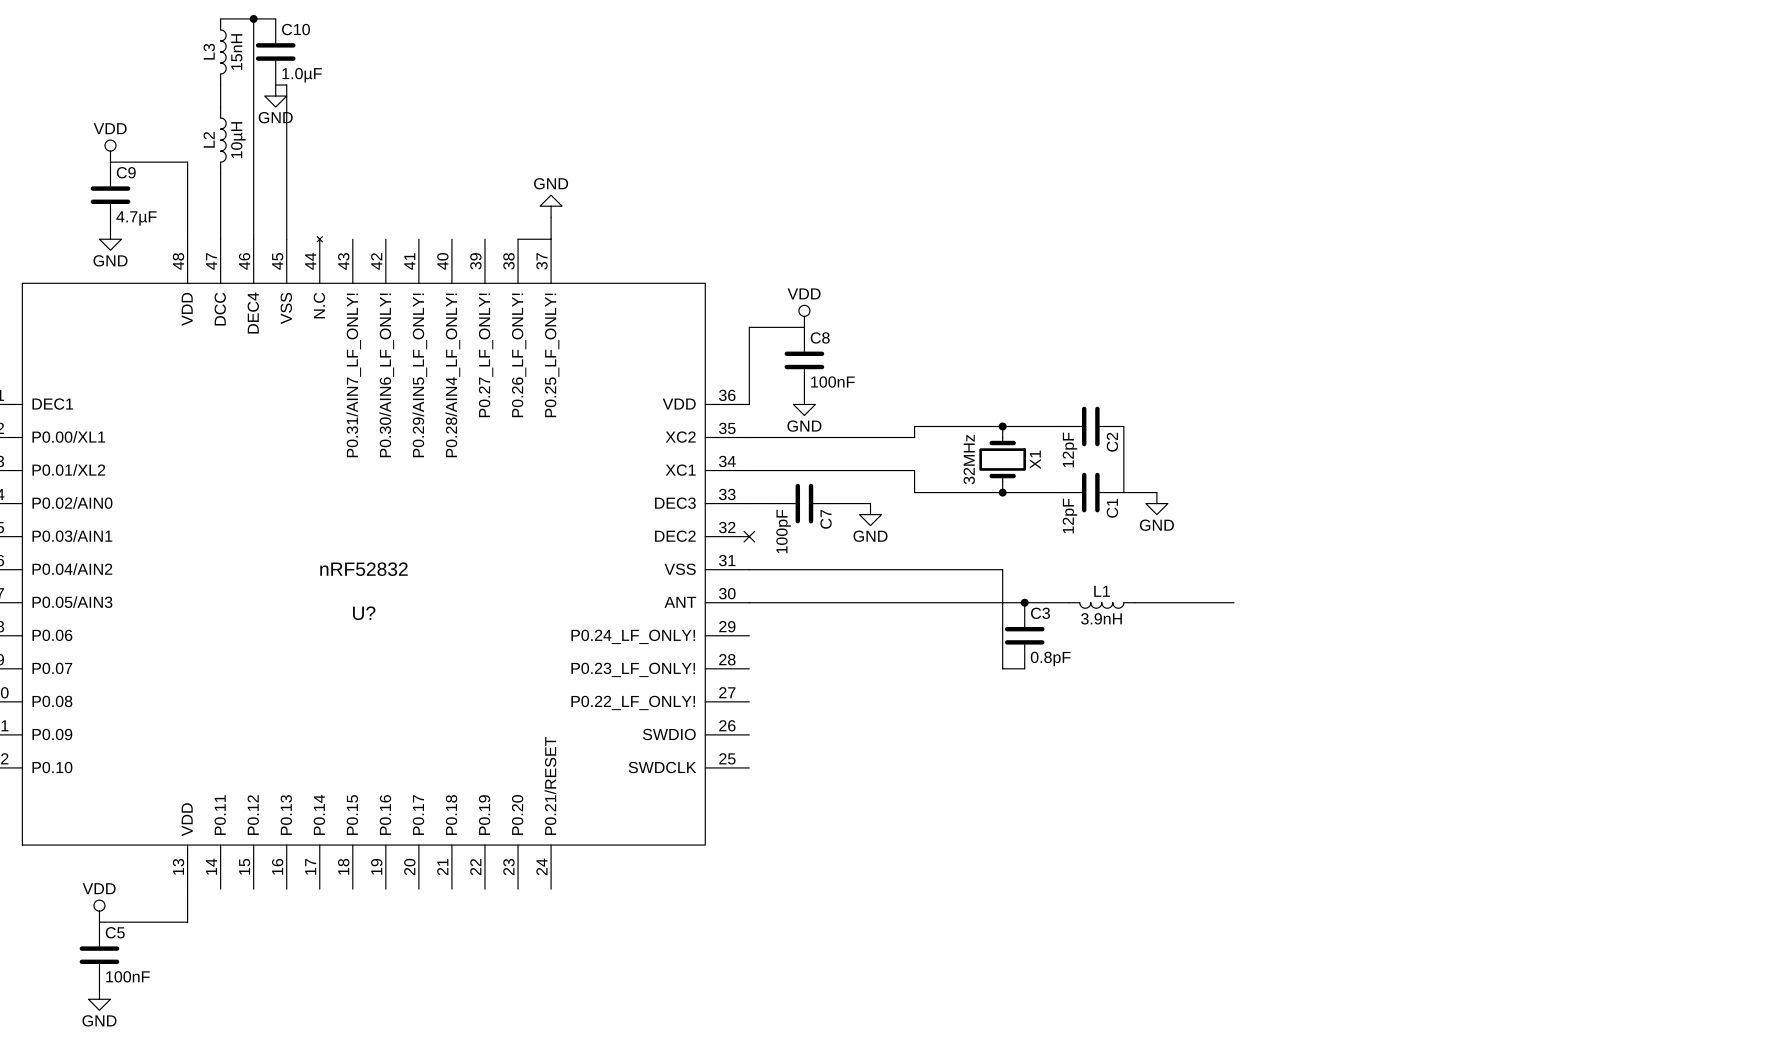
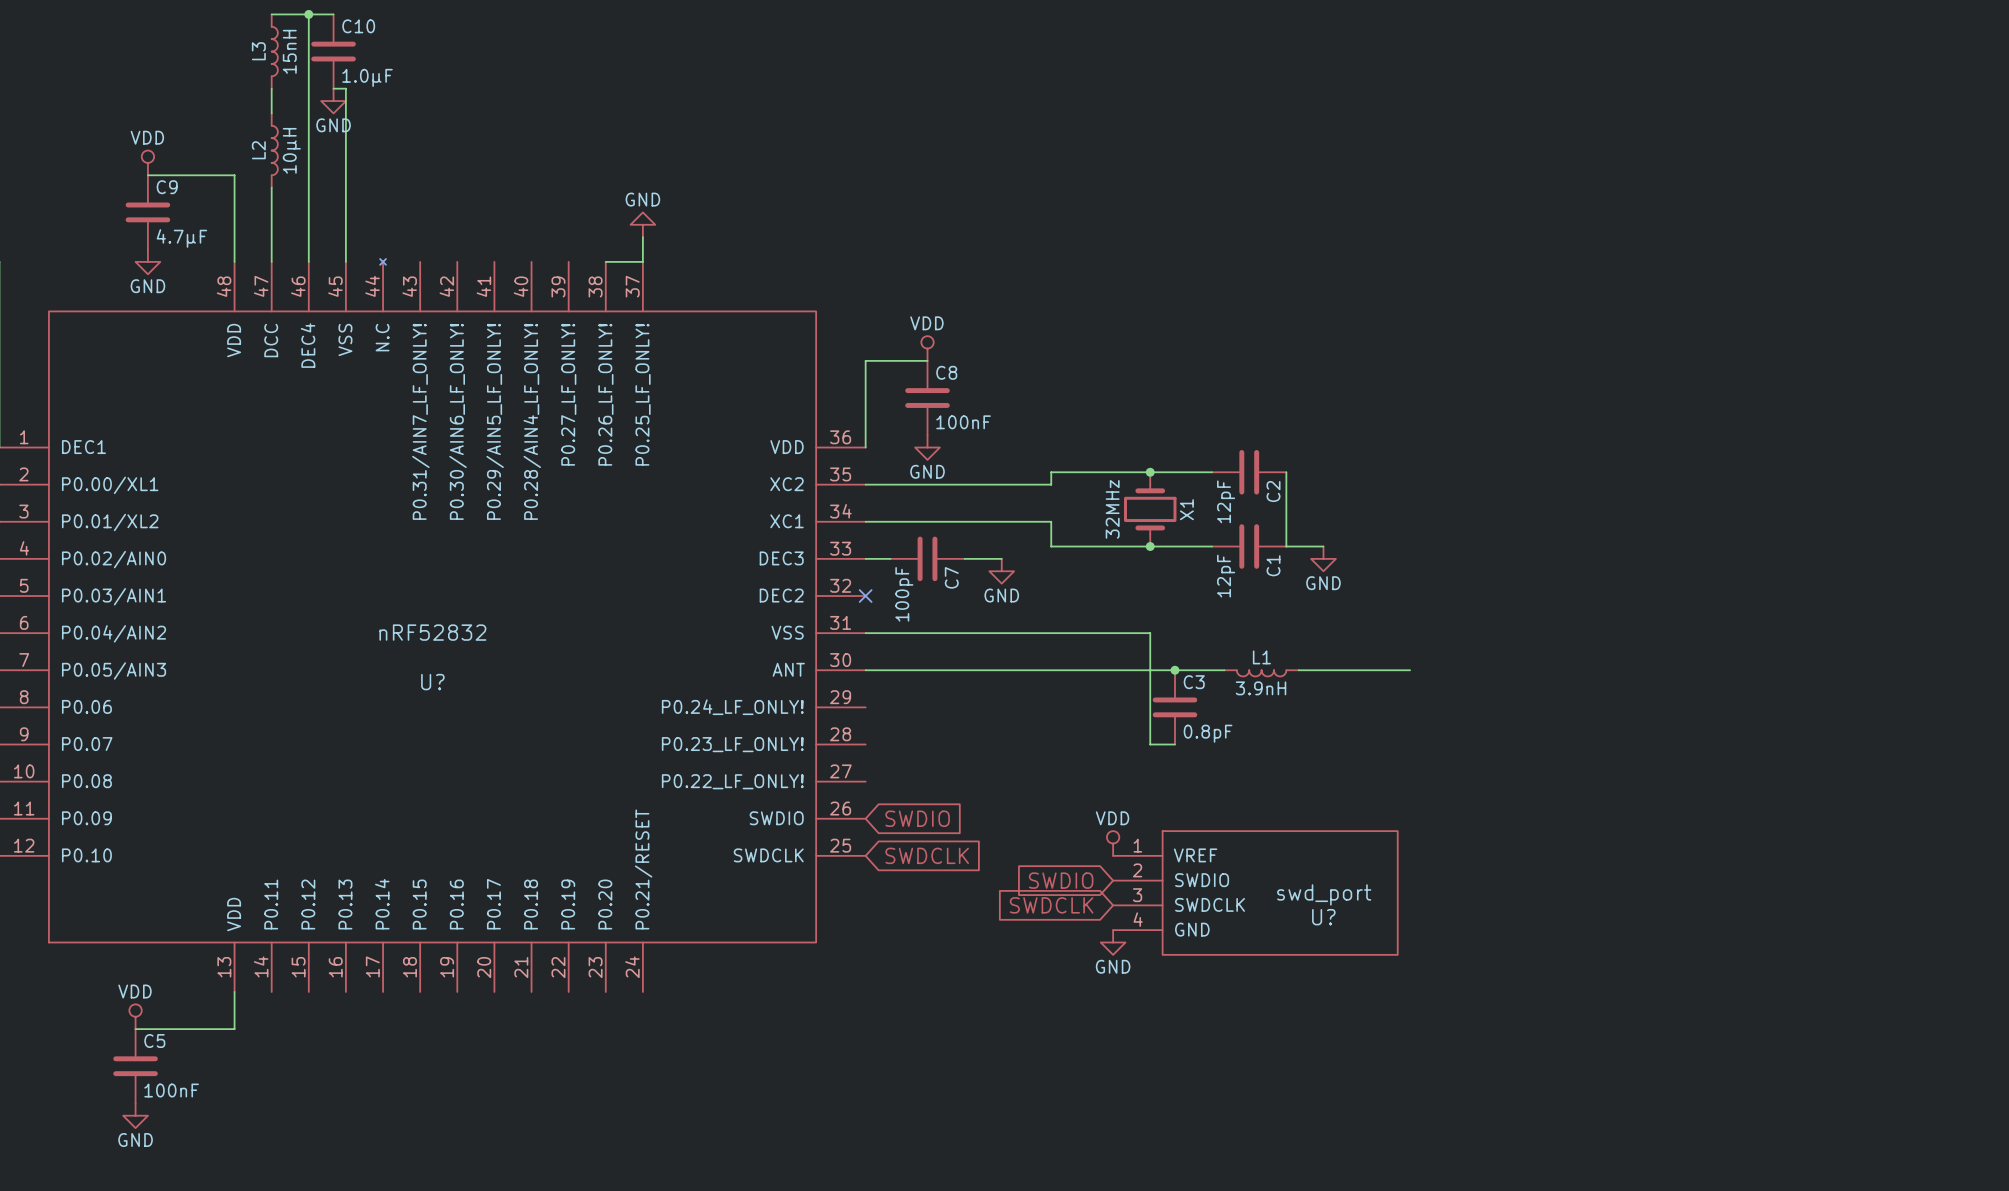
global label: none -> SWDIO (917, 818)
power symbol: none -> VDD (1113, 843)
global label: none -> SWDCLK (927, 855)
global label: none -> SWDIO (1061, 880)
U?: none -> swd_port (1255, 892)
global label: none -> SWDCLK (1051, 905)
power symbol: none -> GND (1113, 942)

